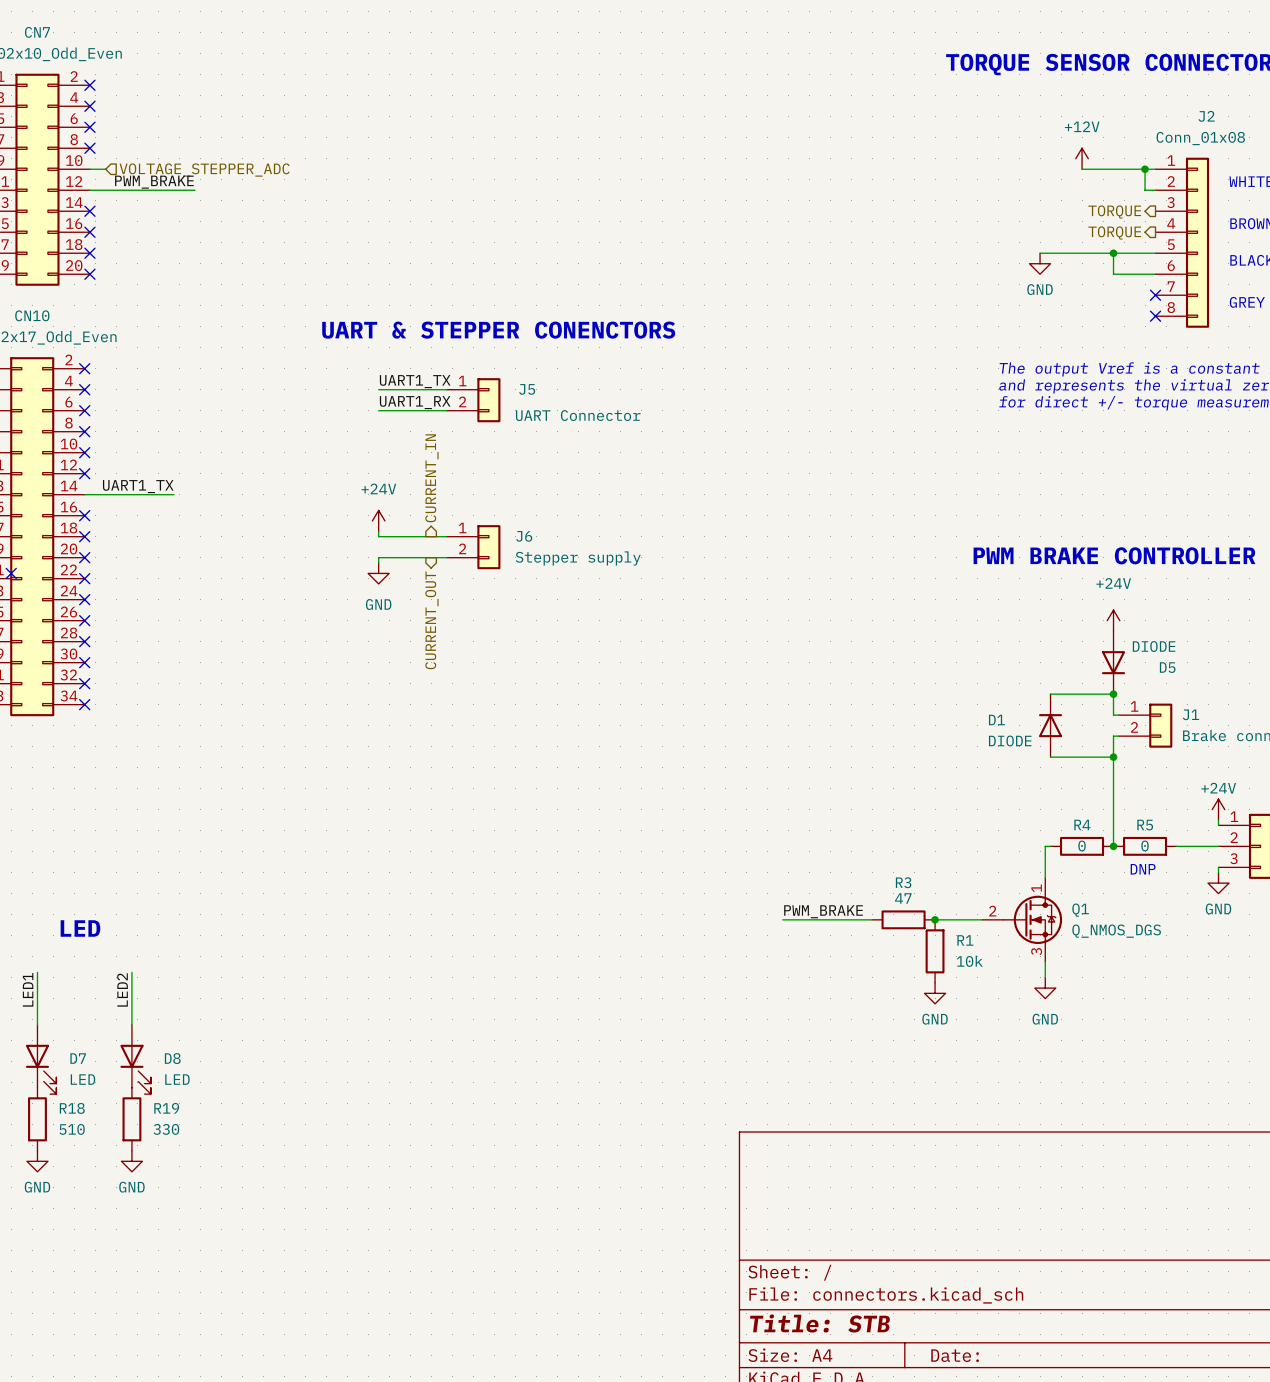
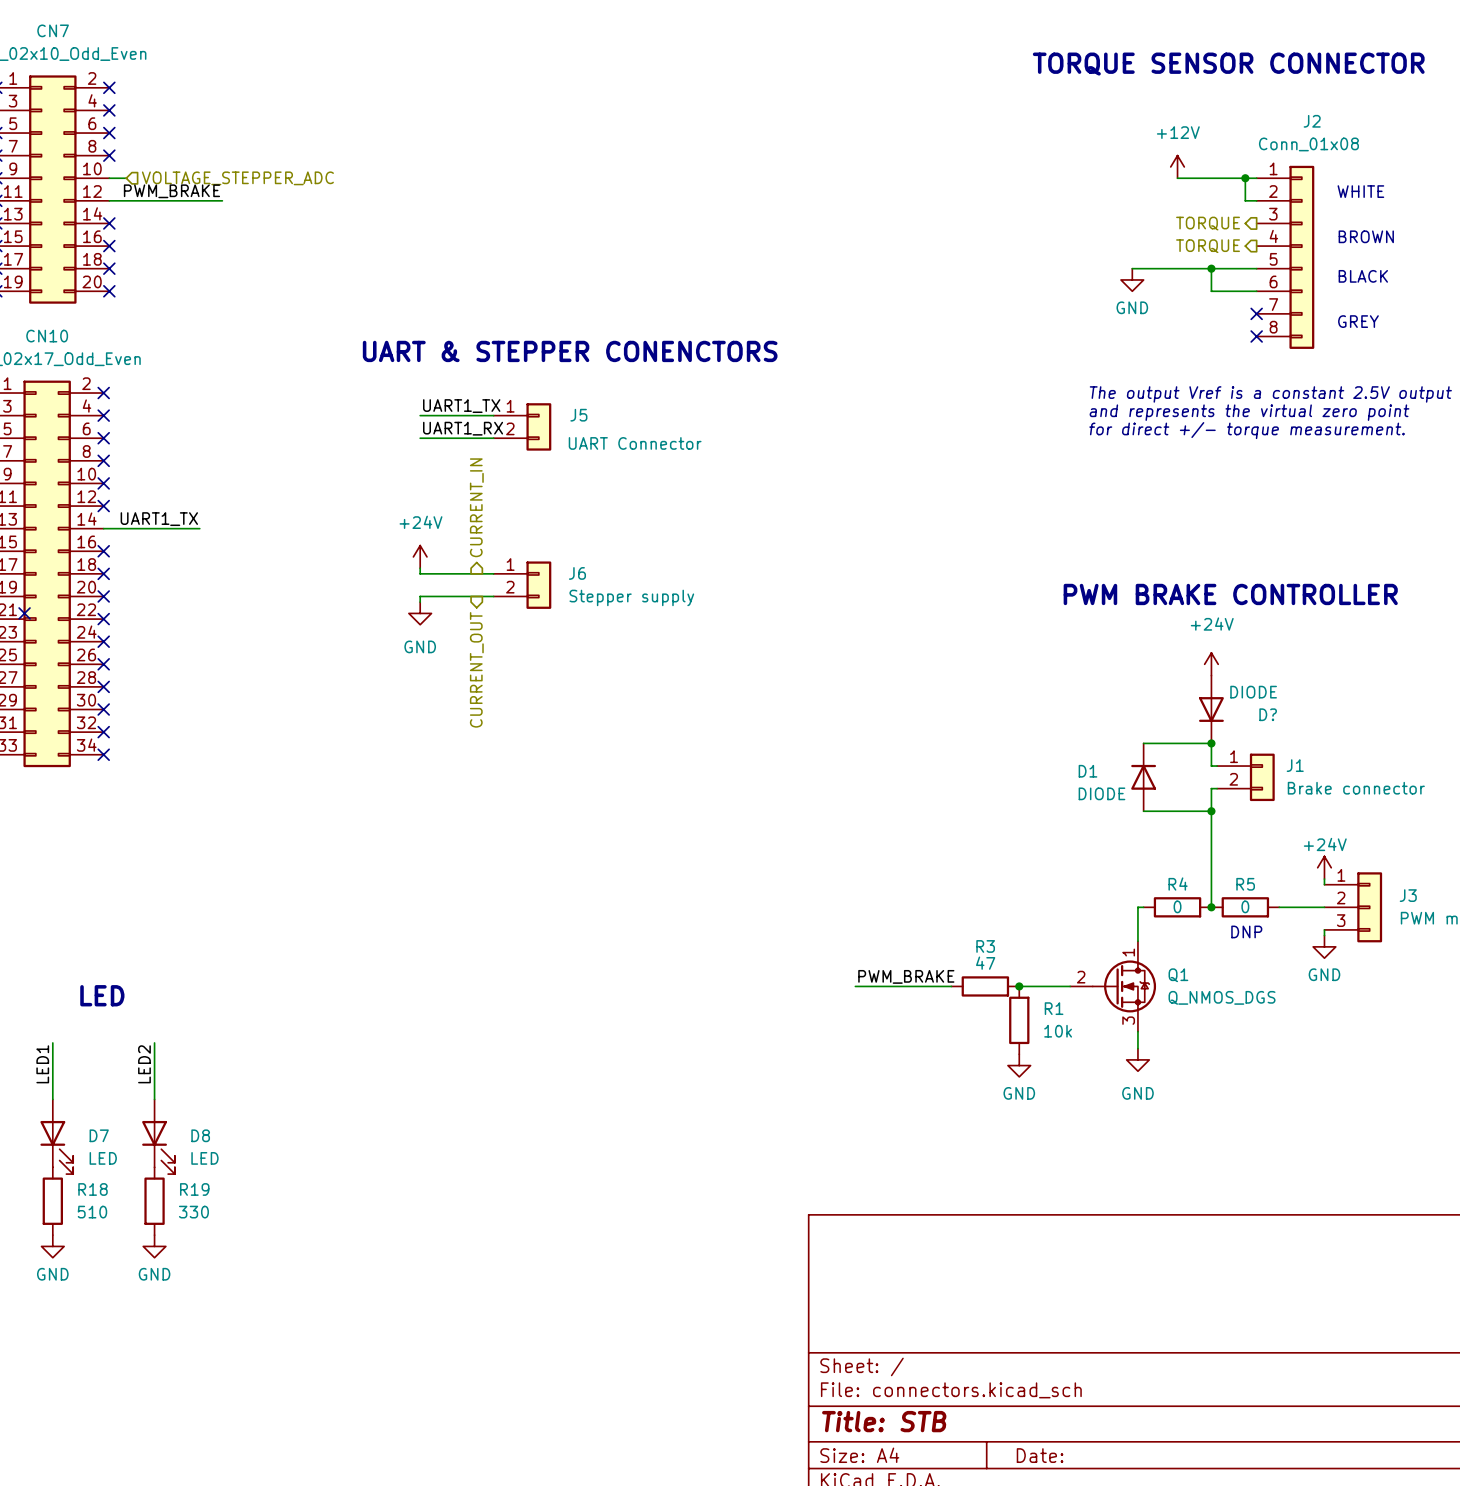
D5 name: D5 (1167, 667) -> D? (1268, 714)

